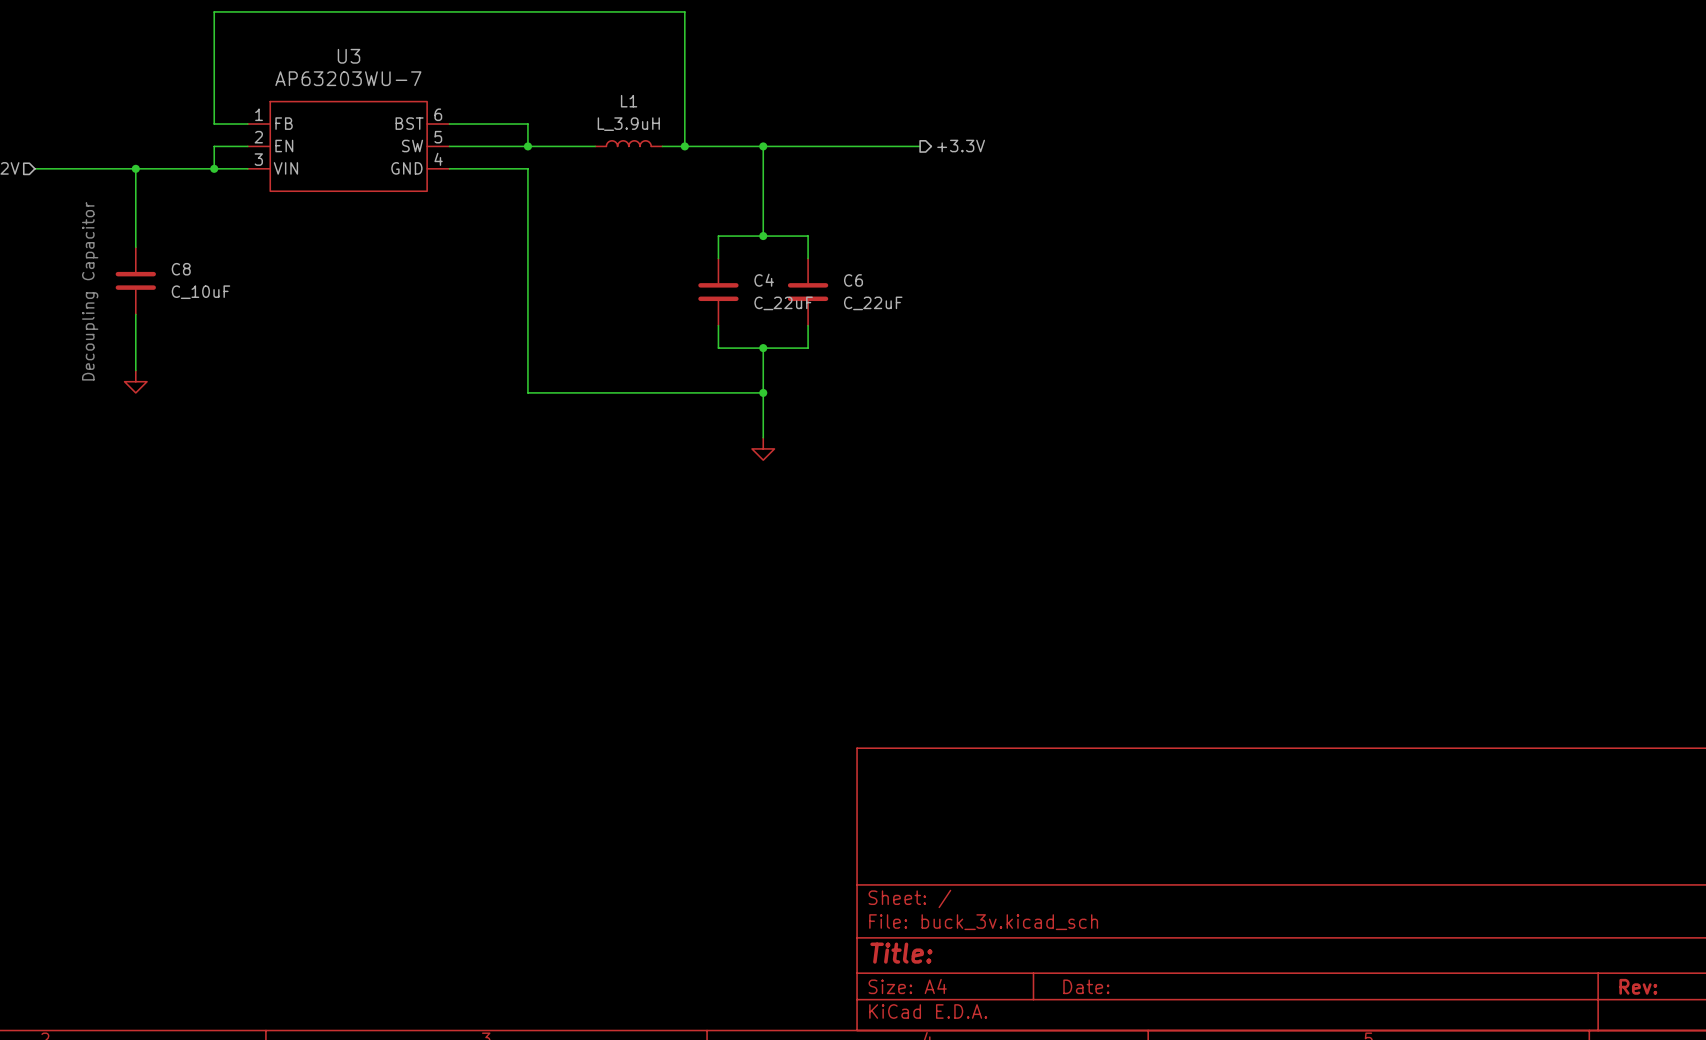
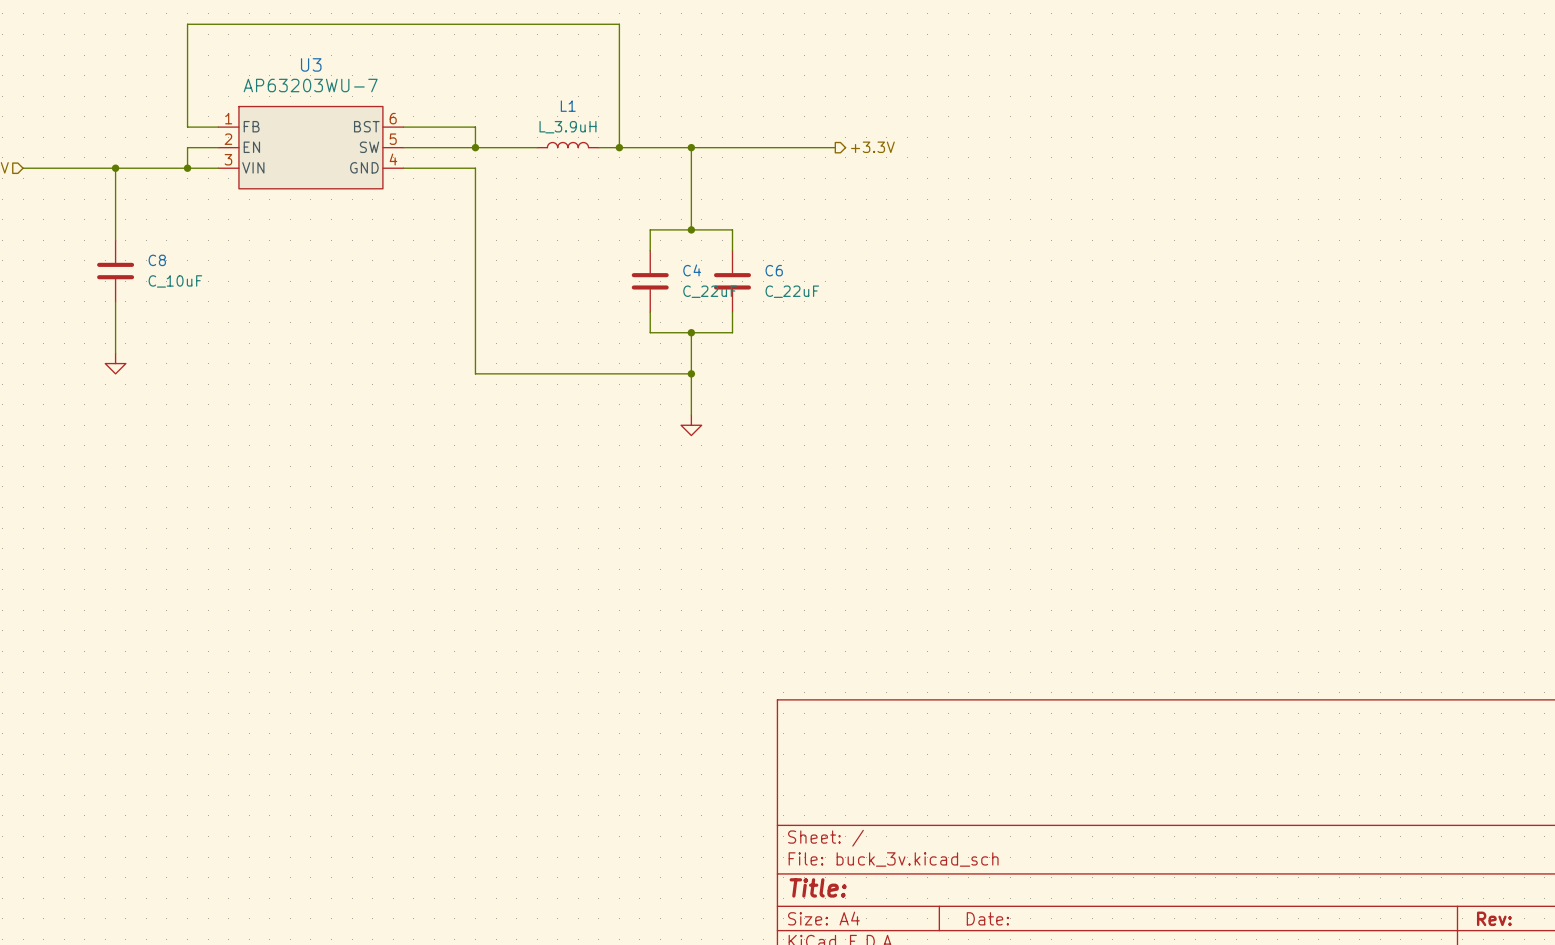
text: Decoupling Capacitor (90, 291) -> none

